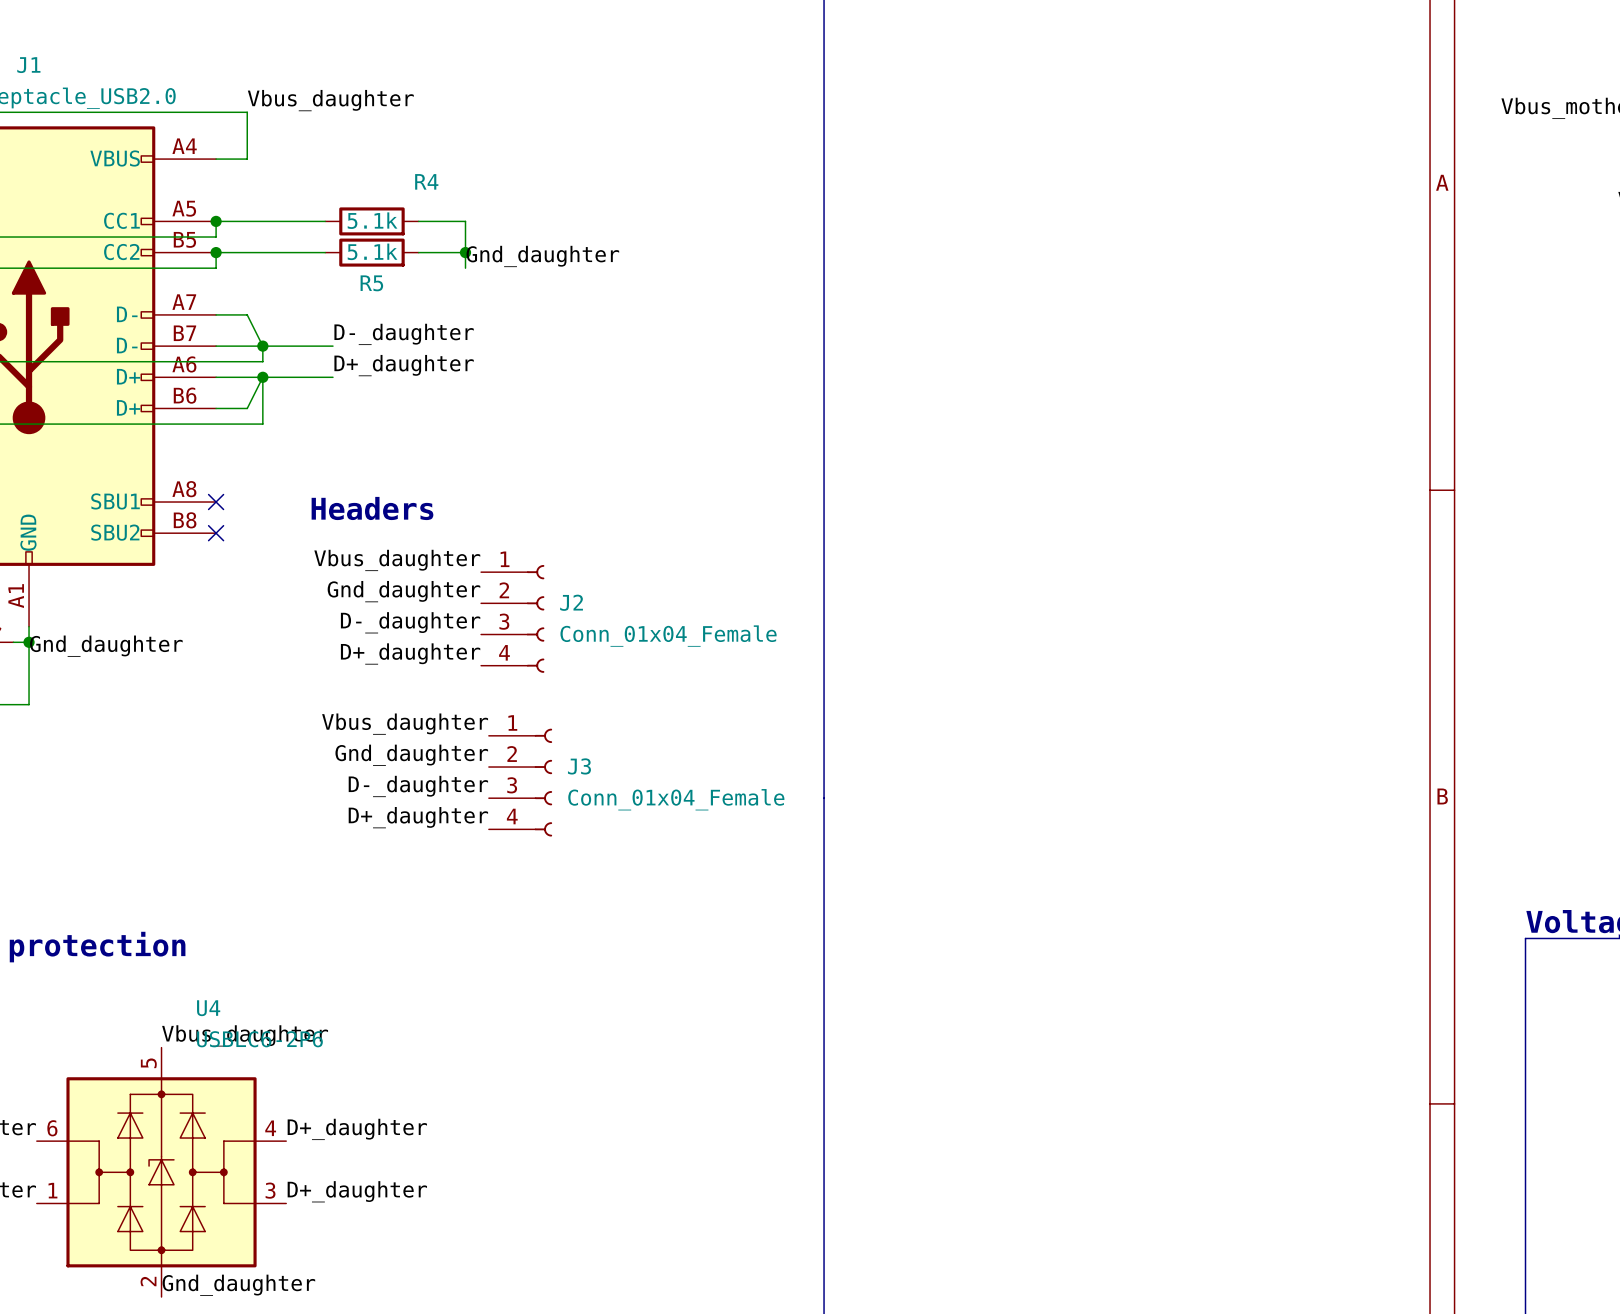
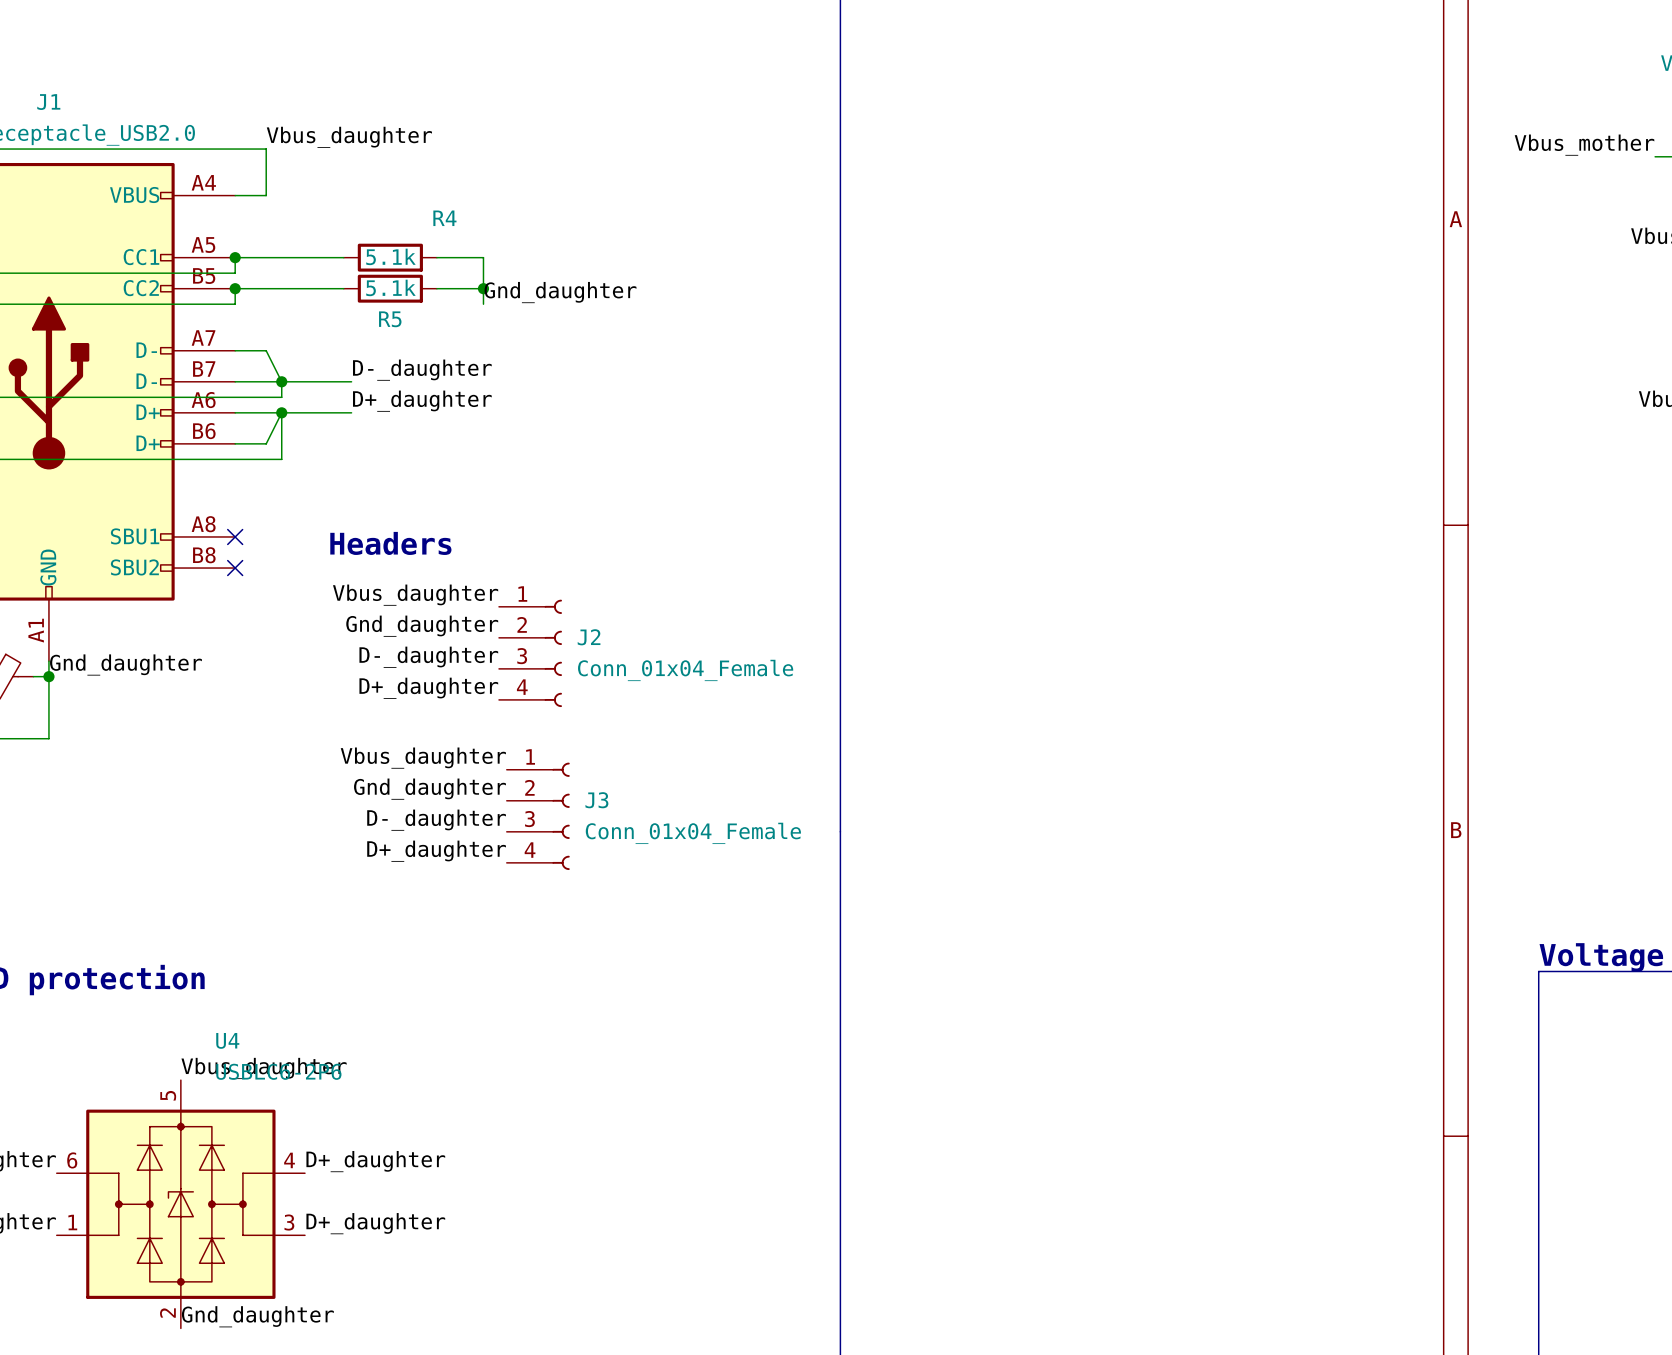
label position: Gnd_daughter (106, 646) -> Gnd_daughter (125, 664)

